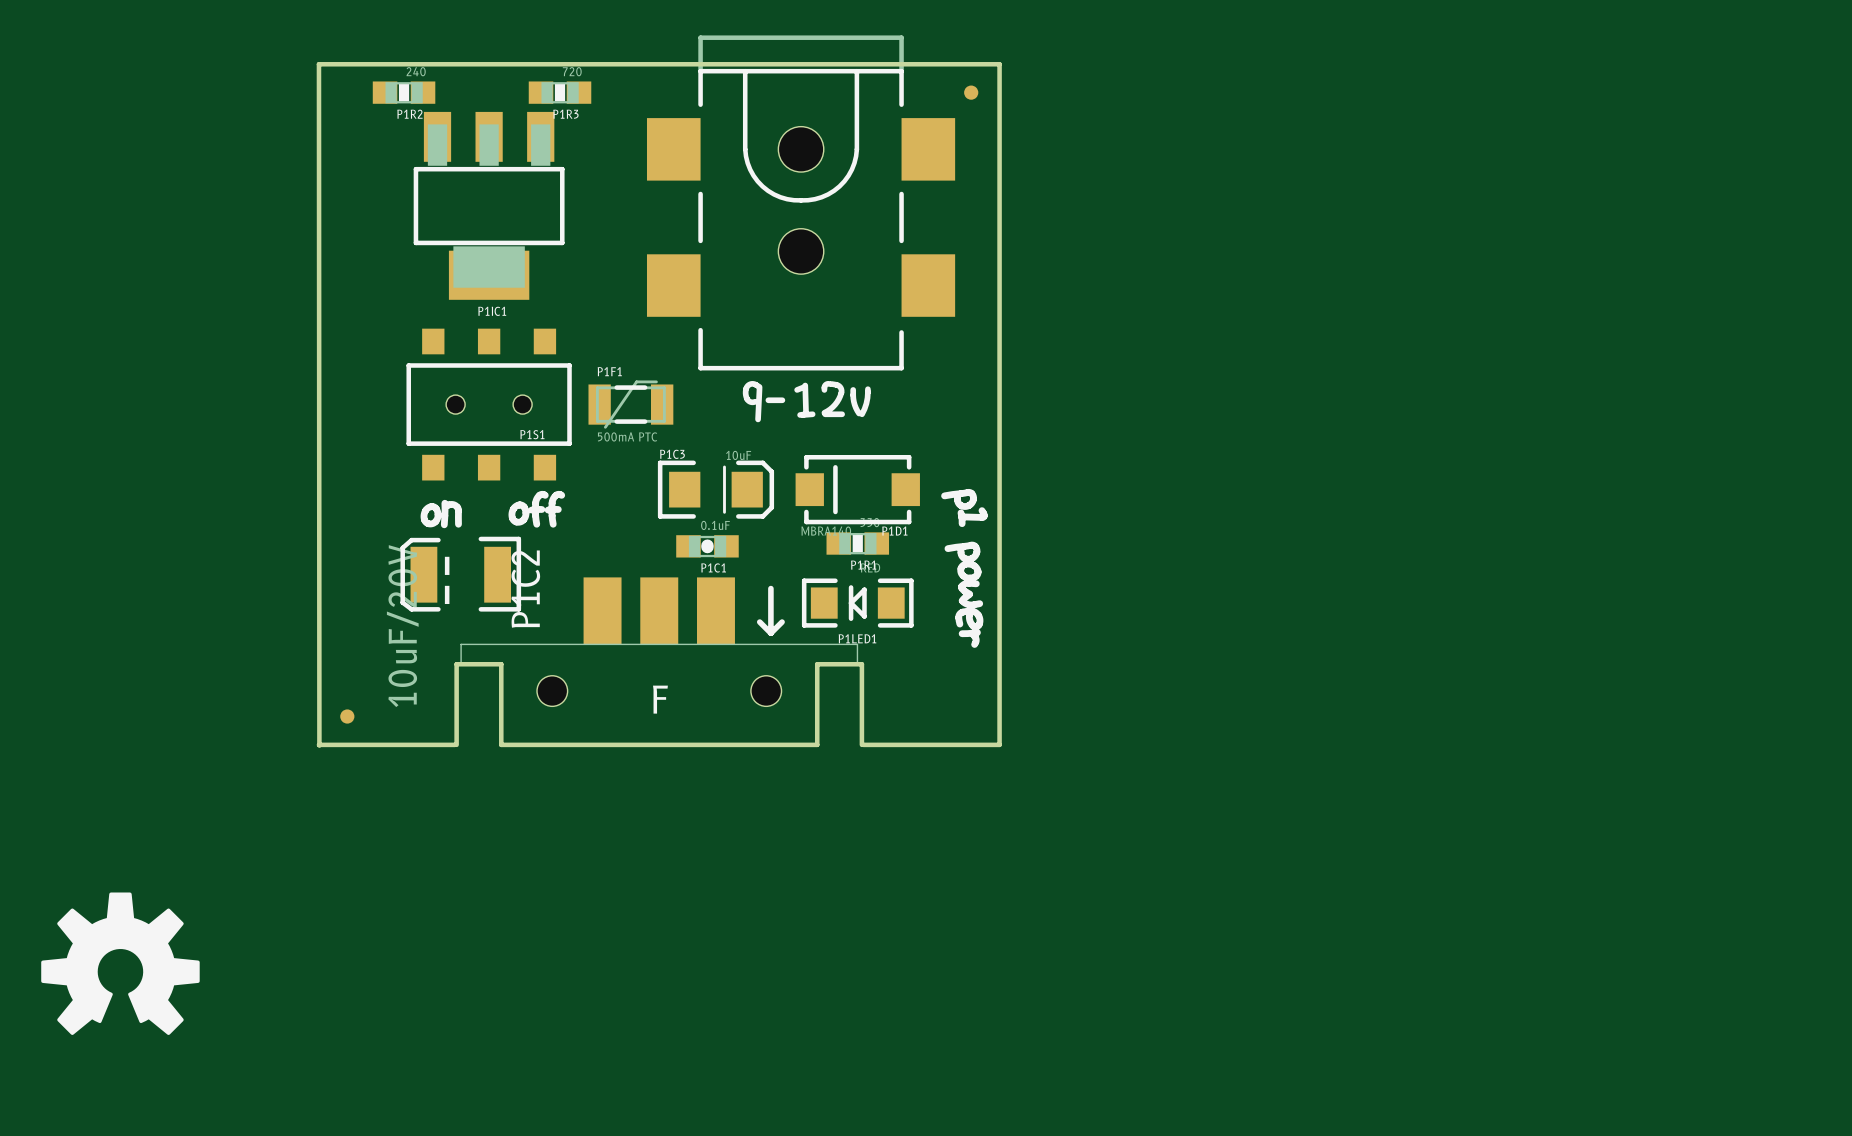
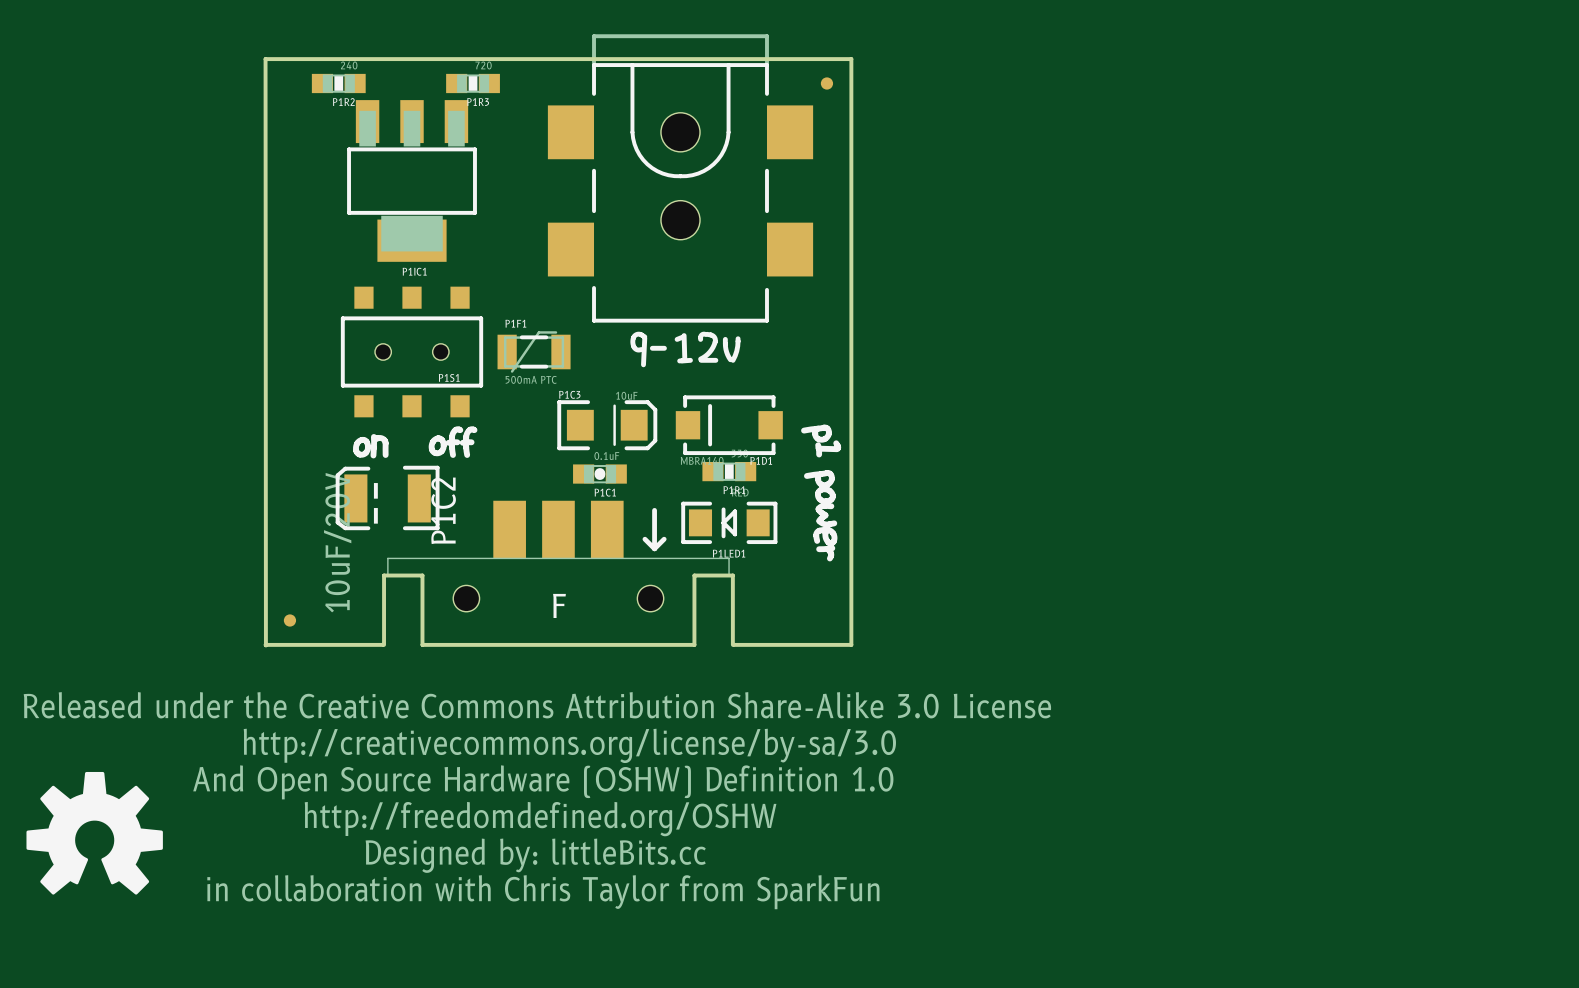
drawing: none -> [23, 692, 1052, 910]

